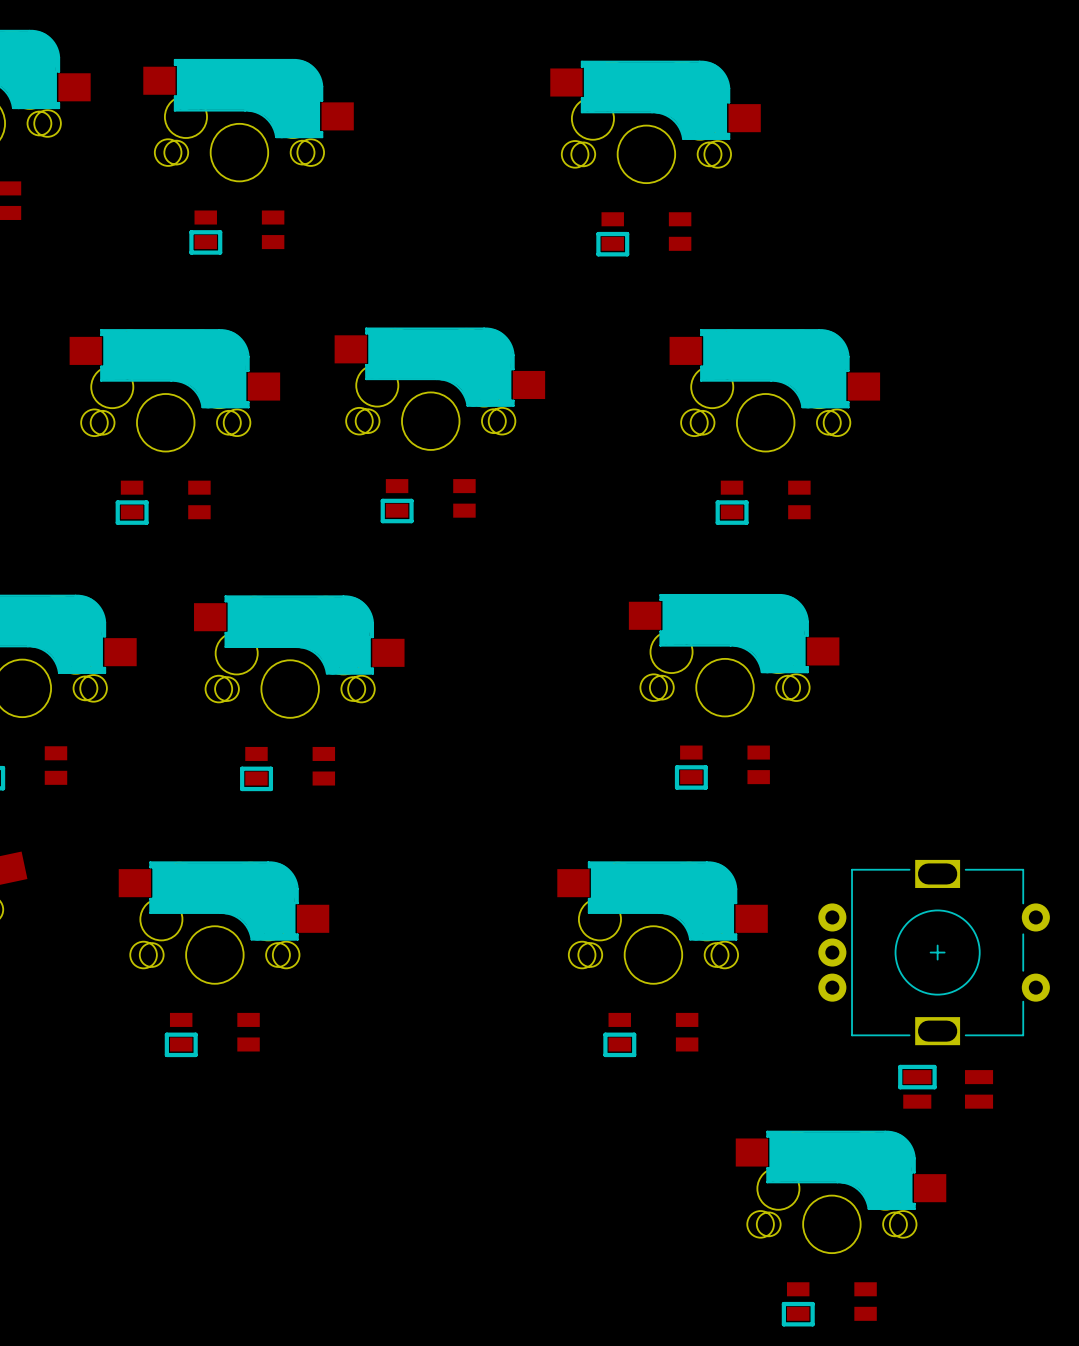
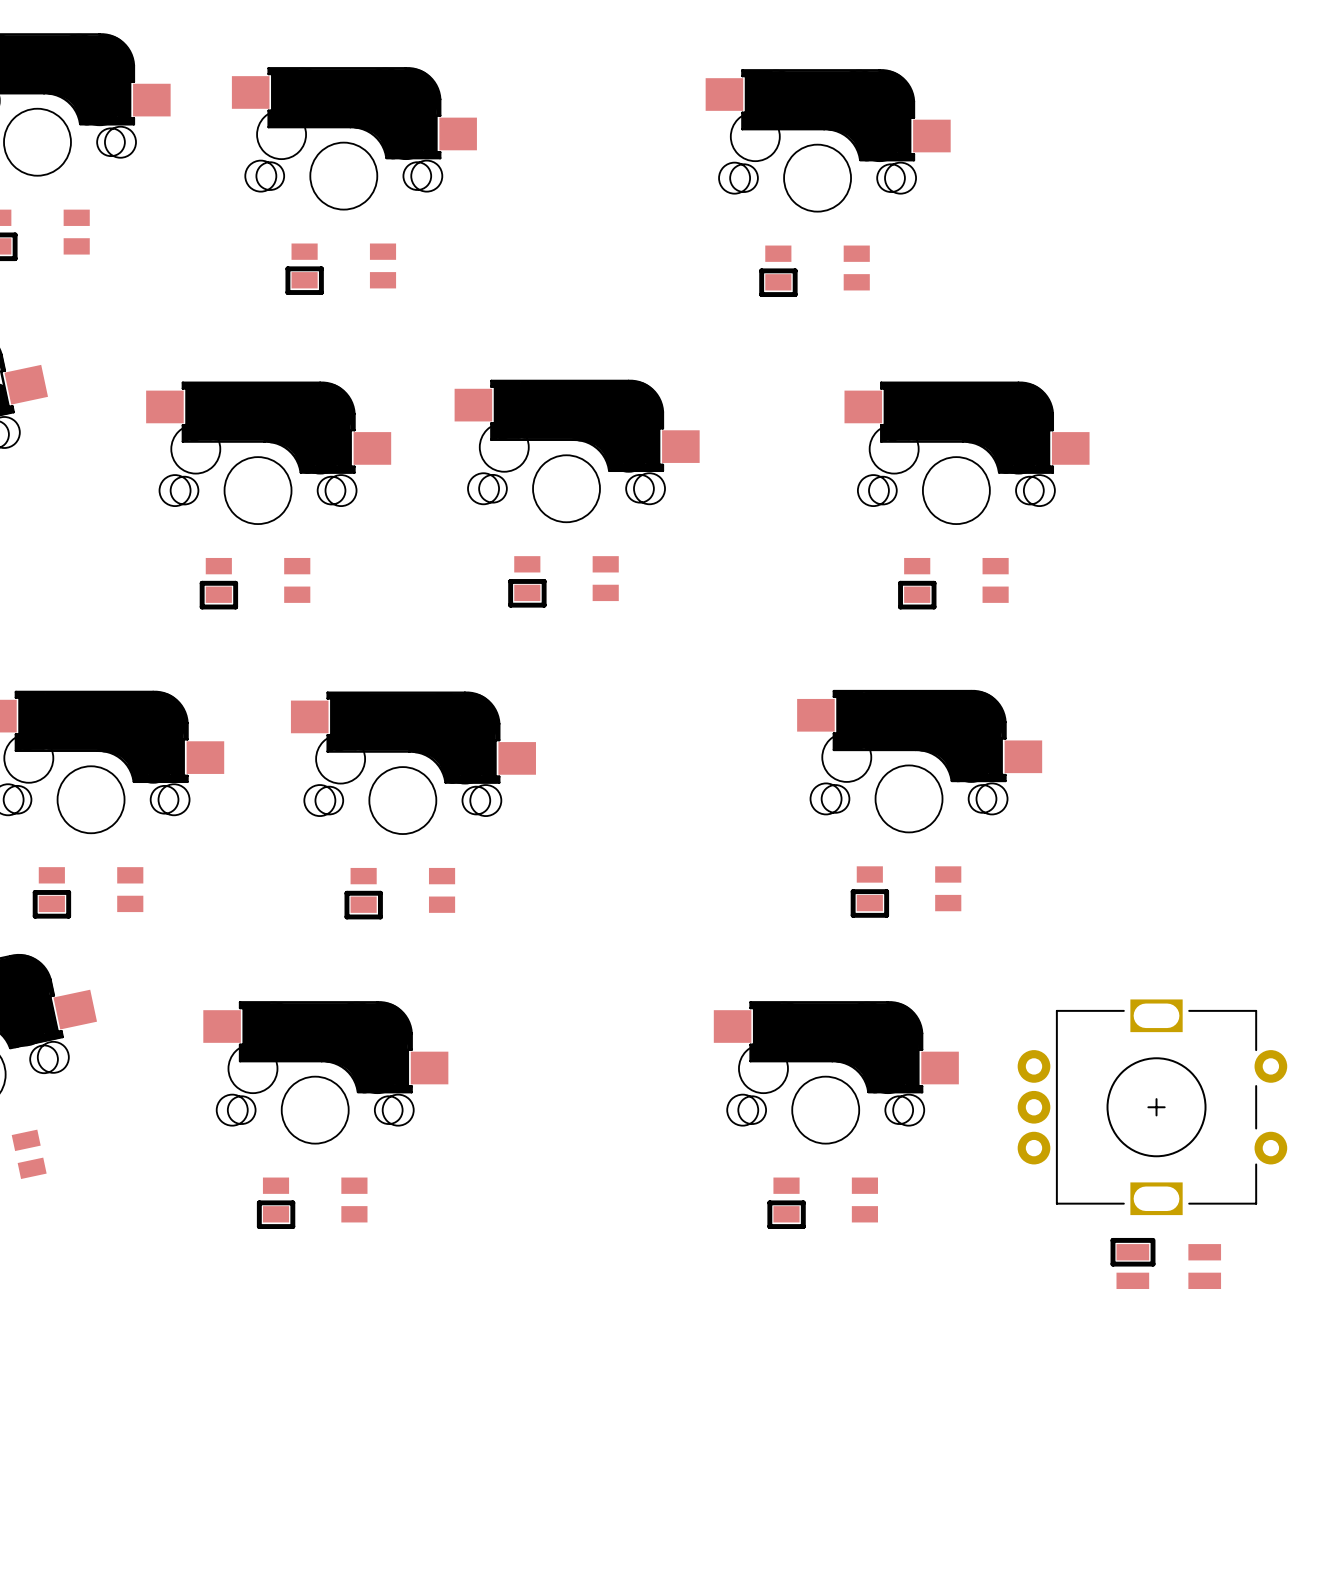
part: (841, 1228) -> none

